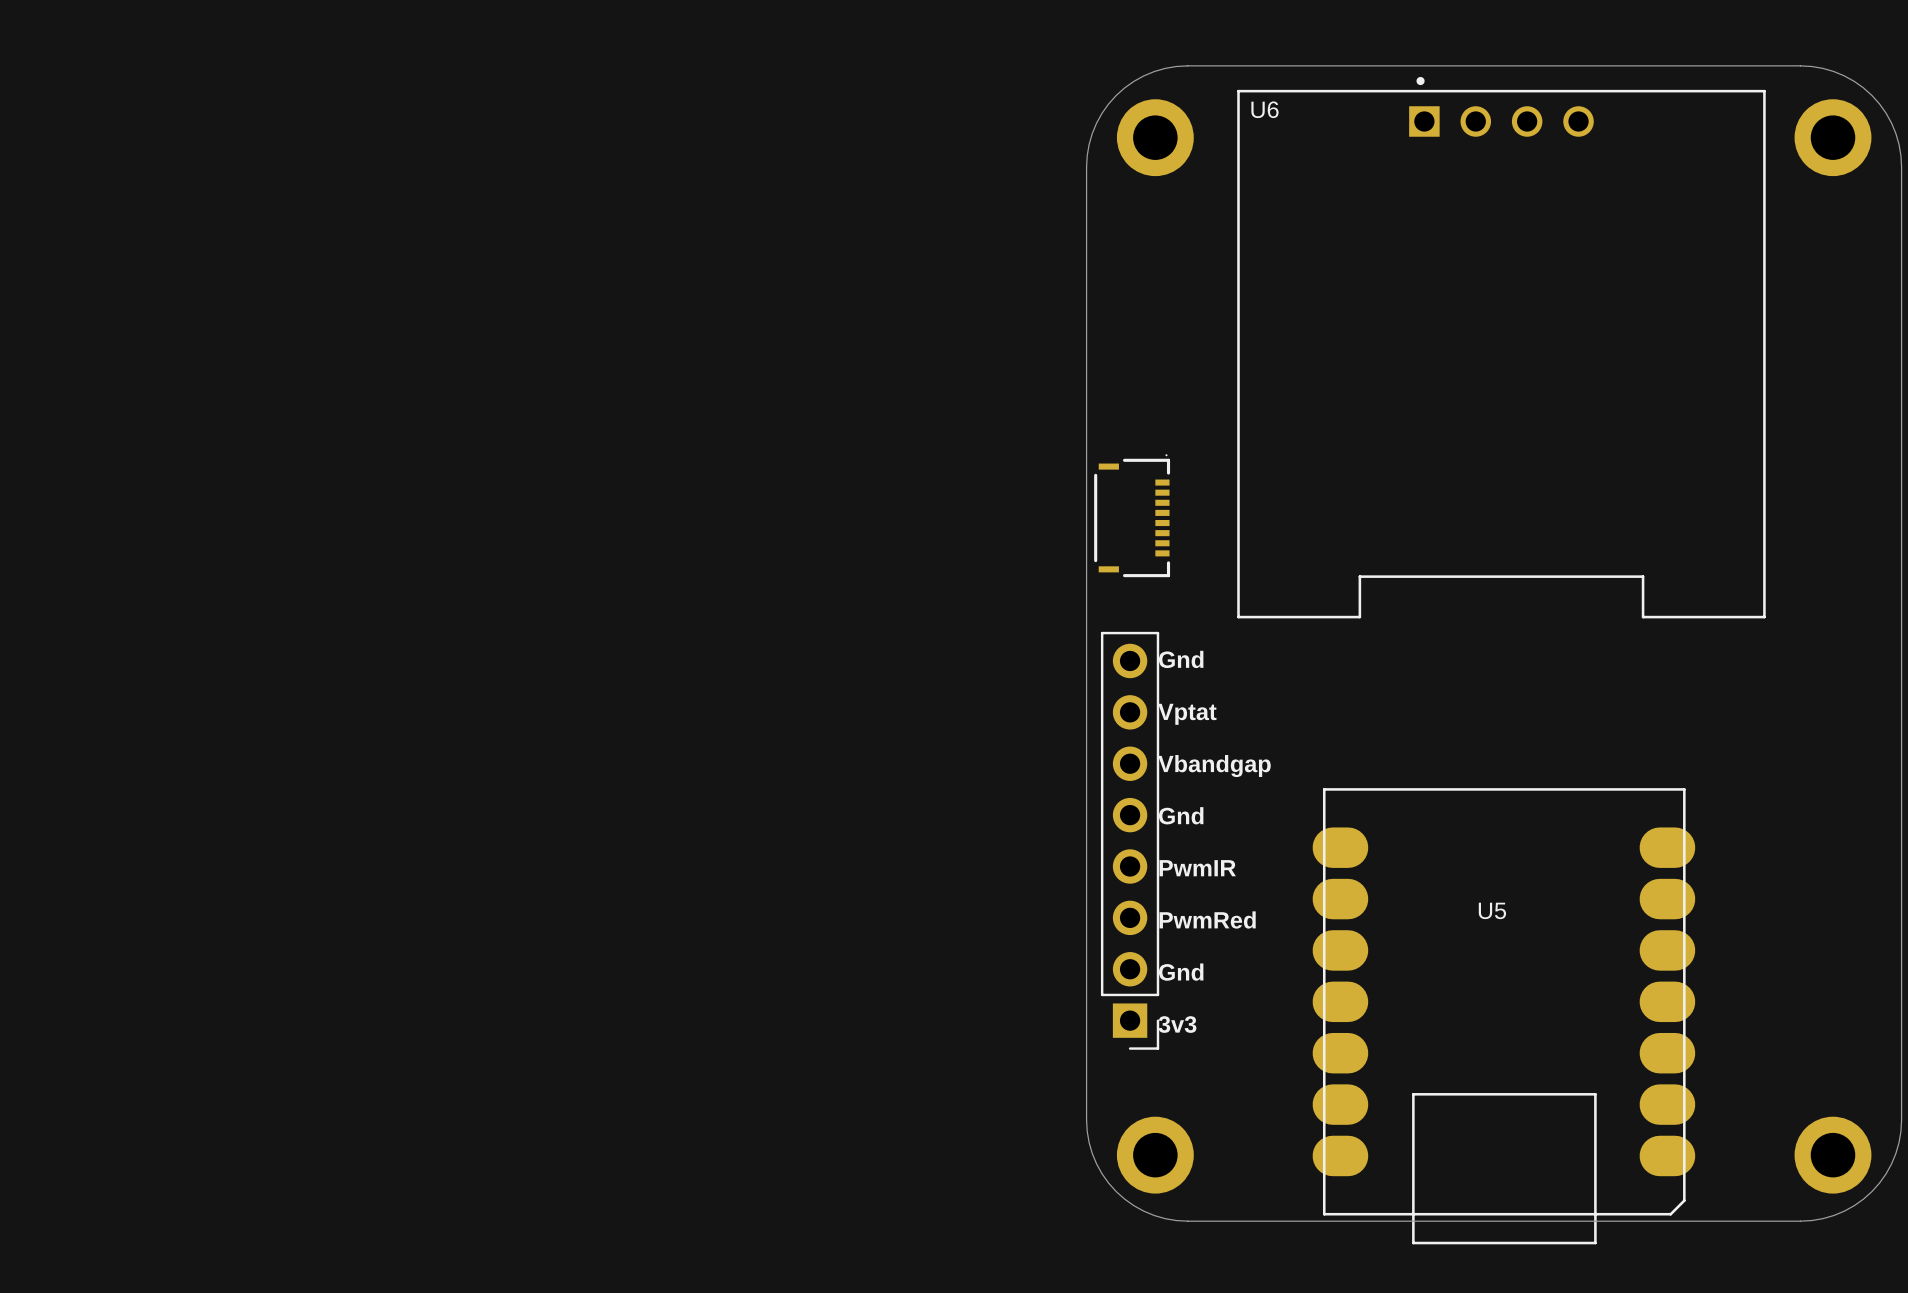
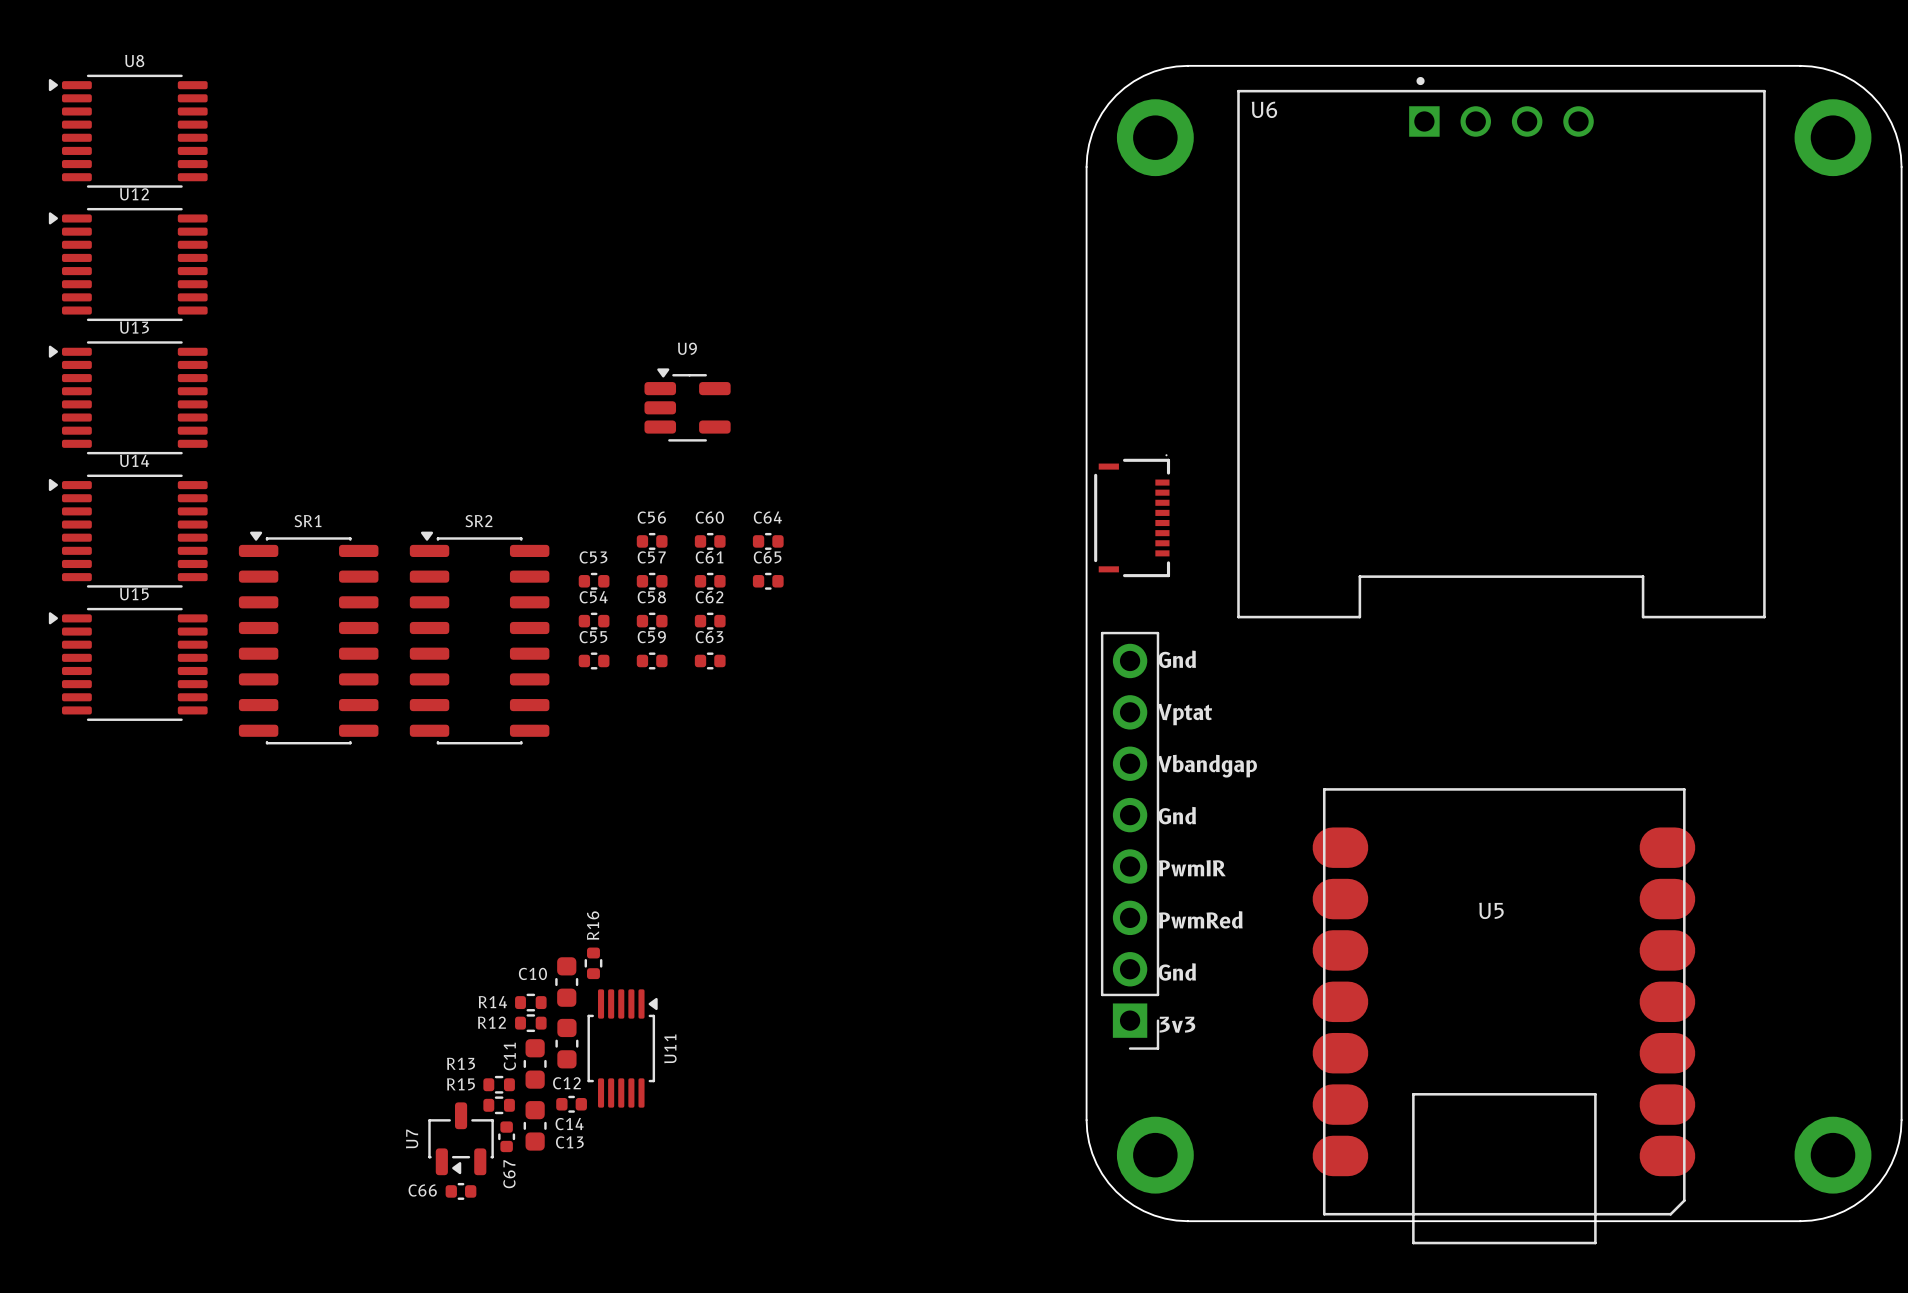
U8: none -> (128, 131)
U12: none -> (128, 264)
U13: none -> (128, 397)
U9: none -> (687, 404)
U14: none -> (128, 531)
C56: none -> (652, 541)
C60: none -> (710, 541)
C64: none -> (768, 541)
C53: none -> (594, 581)
C57: none -> (652, 581)
C61: none -> (710, 581)
C65: none -> (768, 581)
C54: none -> (594, 621)
C58: none -> (652, 621)
C62: none -> (710, 621)
SR1: none -> (308, 638)
SR2: none -> (479, 638)
C55: none -> (594, 660)
C59: none -> (652, 660)
C63: none -> (710, 660)
U15: none -> (128, 664)
R16: none -> (593, 963)
C10: none -> (566, 982)
R14: none -> (530, 1002)
R12: none -> (530, 1023)
C12: none -> (566, 1043)
U11: none -> (622, 1048)
C11: none -> (535, 1063)
R13: none -> (499, 1084)
C14: none -> (571, 1104)
R15: none -> (499, 1105)
C13: none -> (535, 1125)
C67: none -> (506, 1136)
U7: none -> (461, 1138)
C66: none -> (460, 1191)

